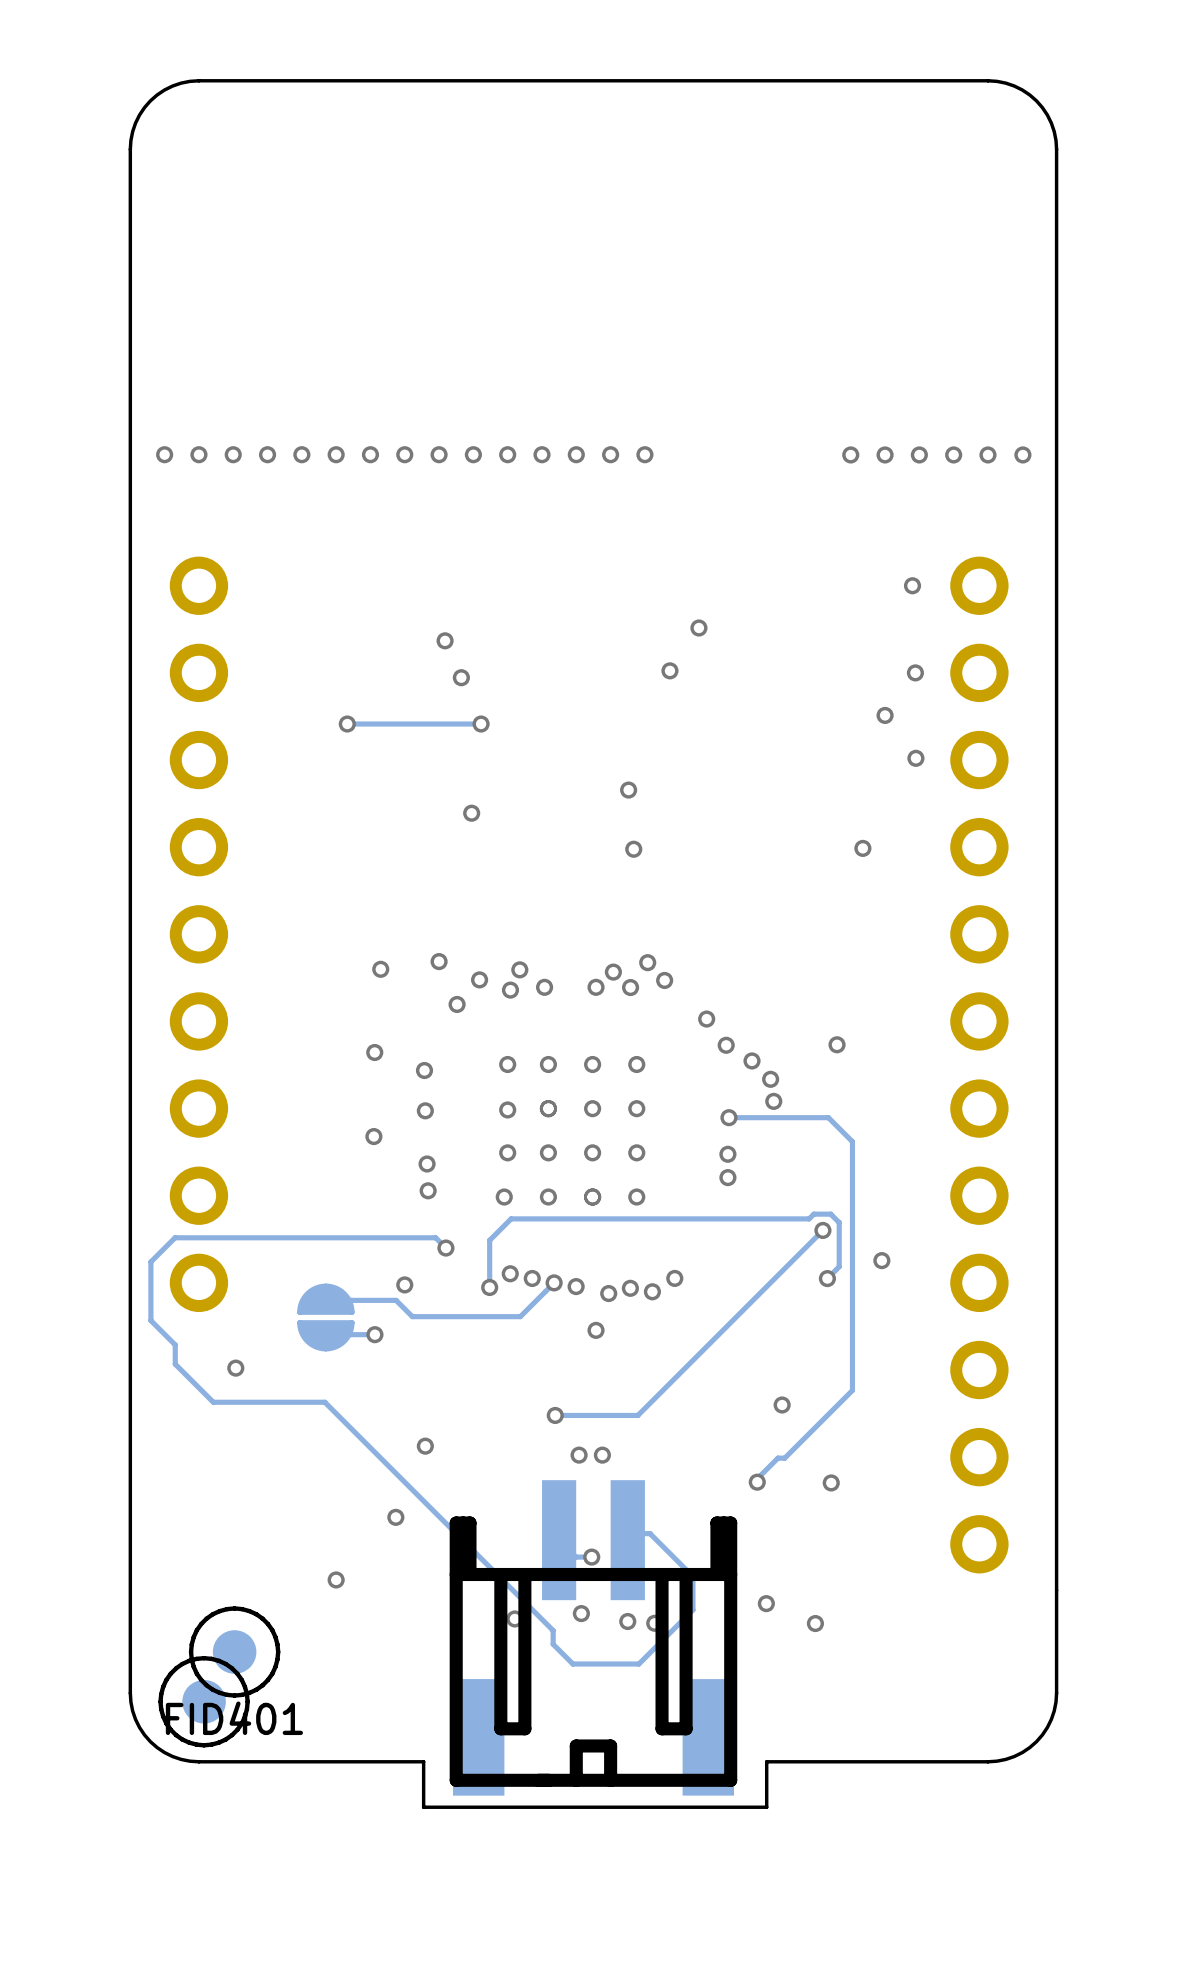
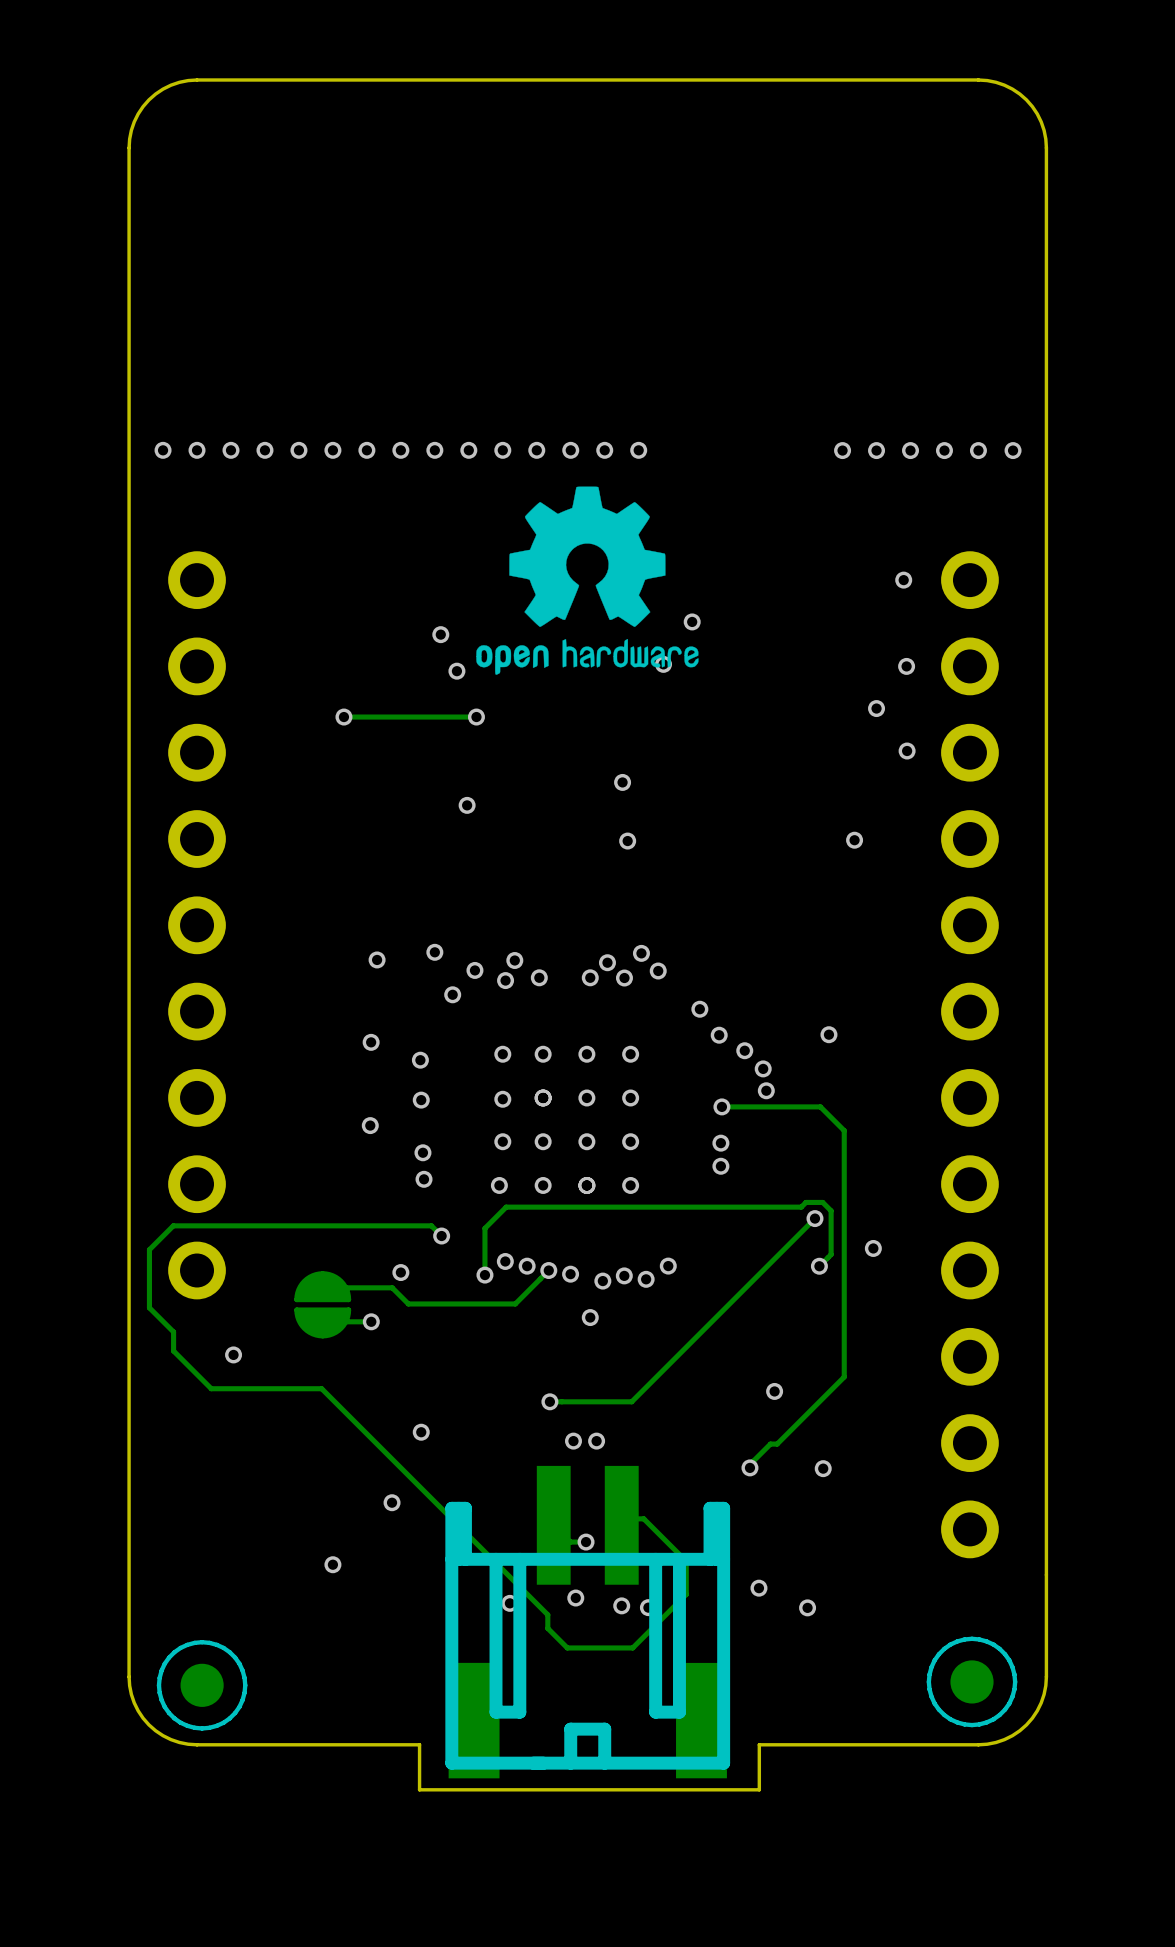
drawing: none -> [476, 486, 699, 675]
FID401: (234, 1652) -> none
part: none -> (972, 1681)

